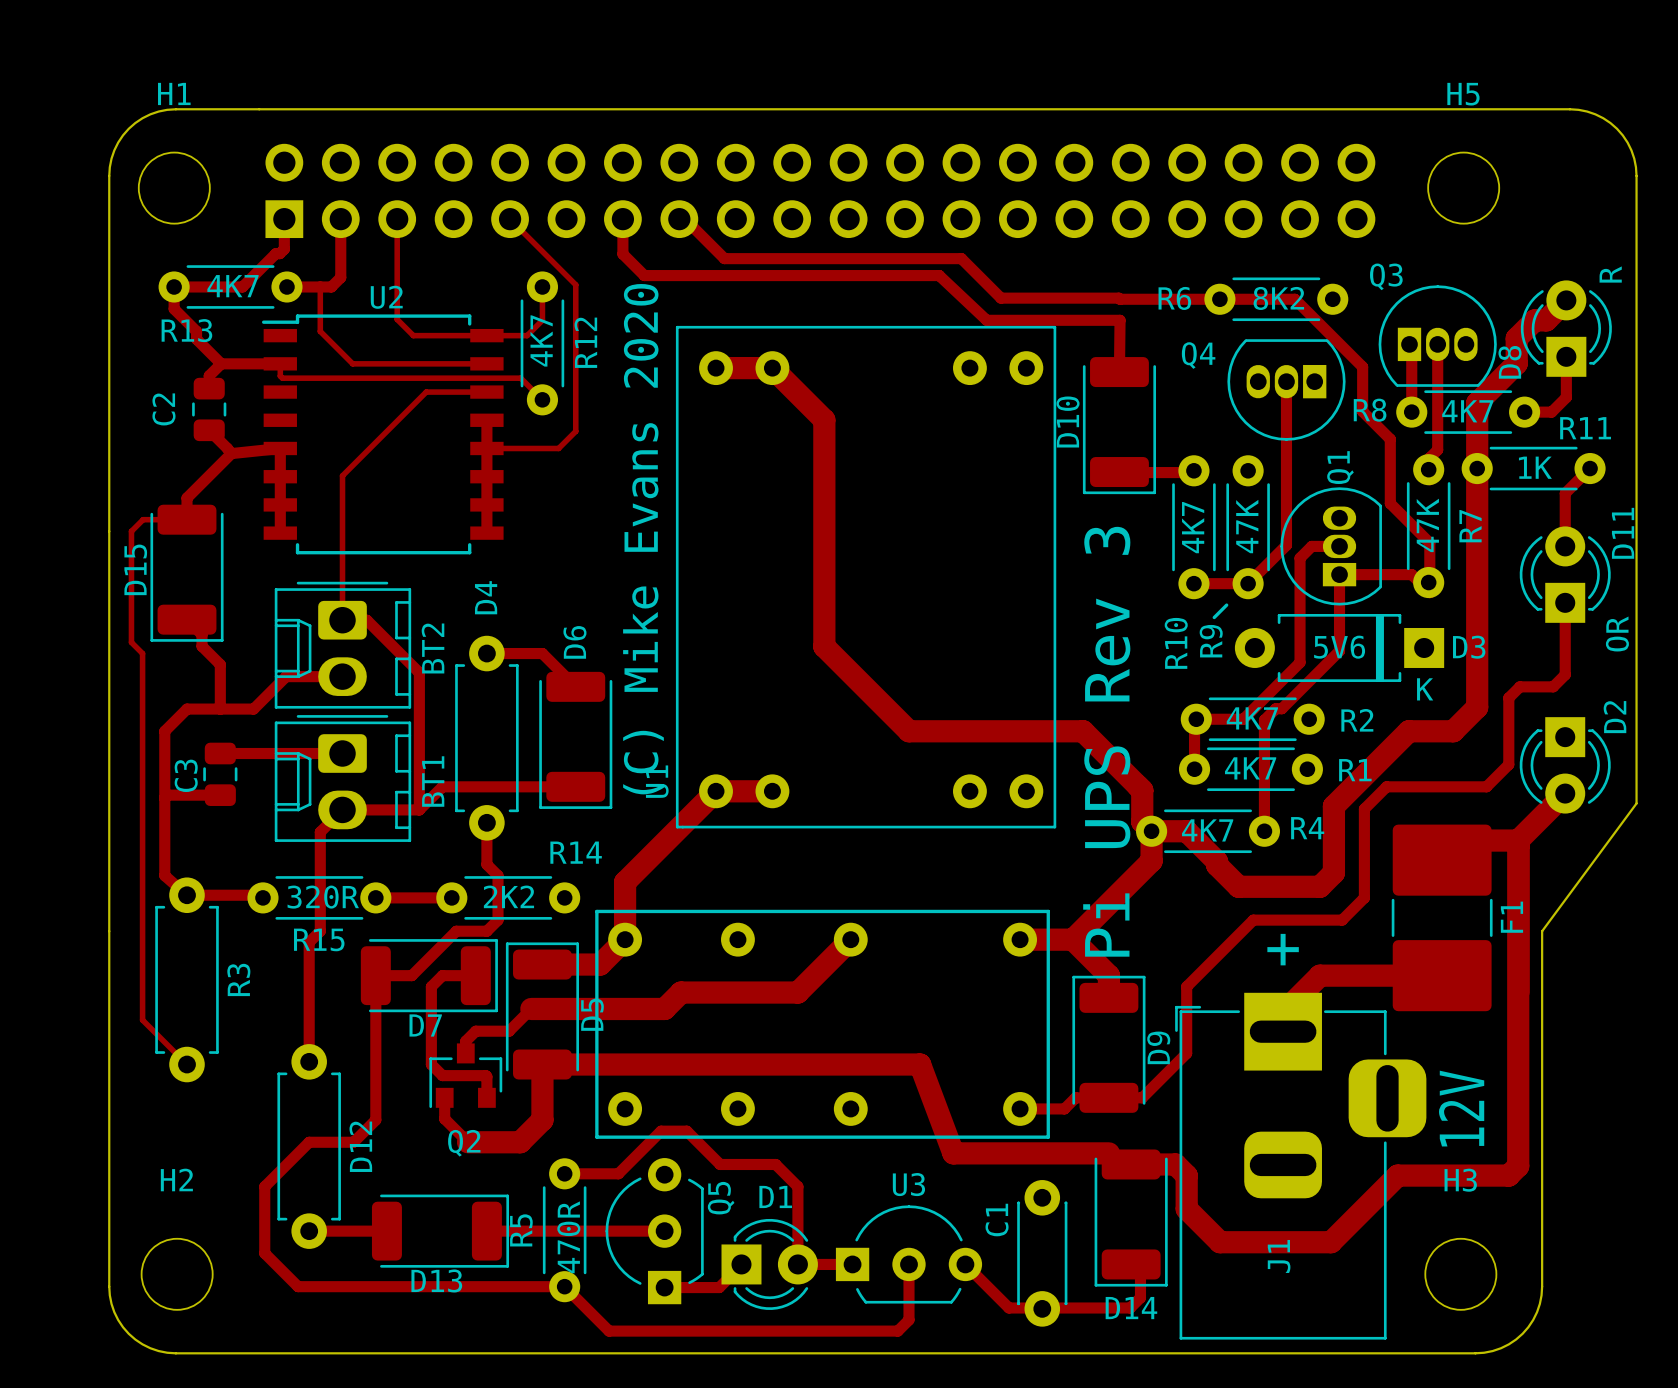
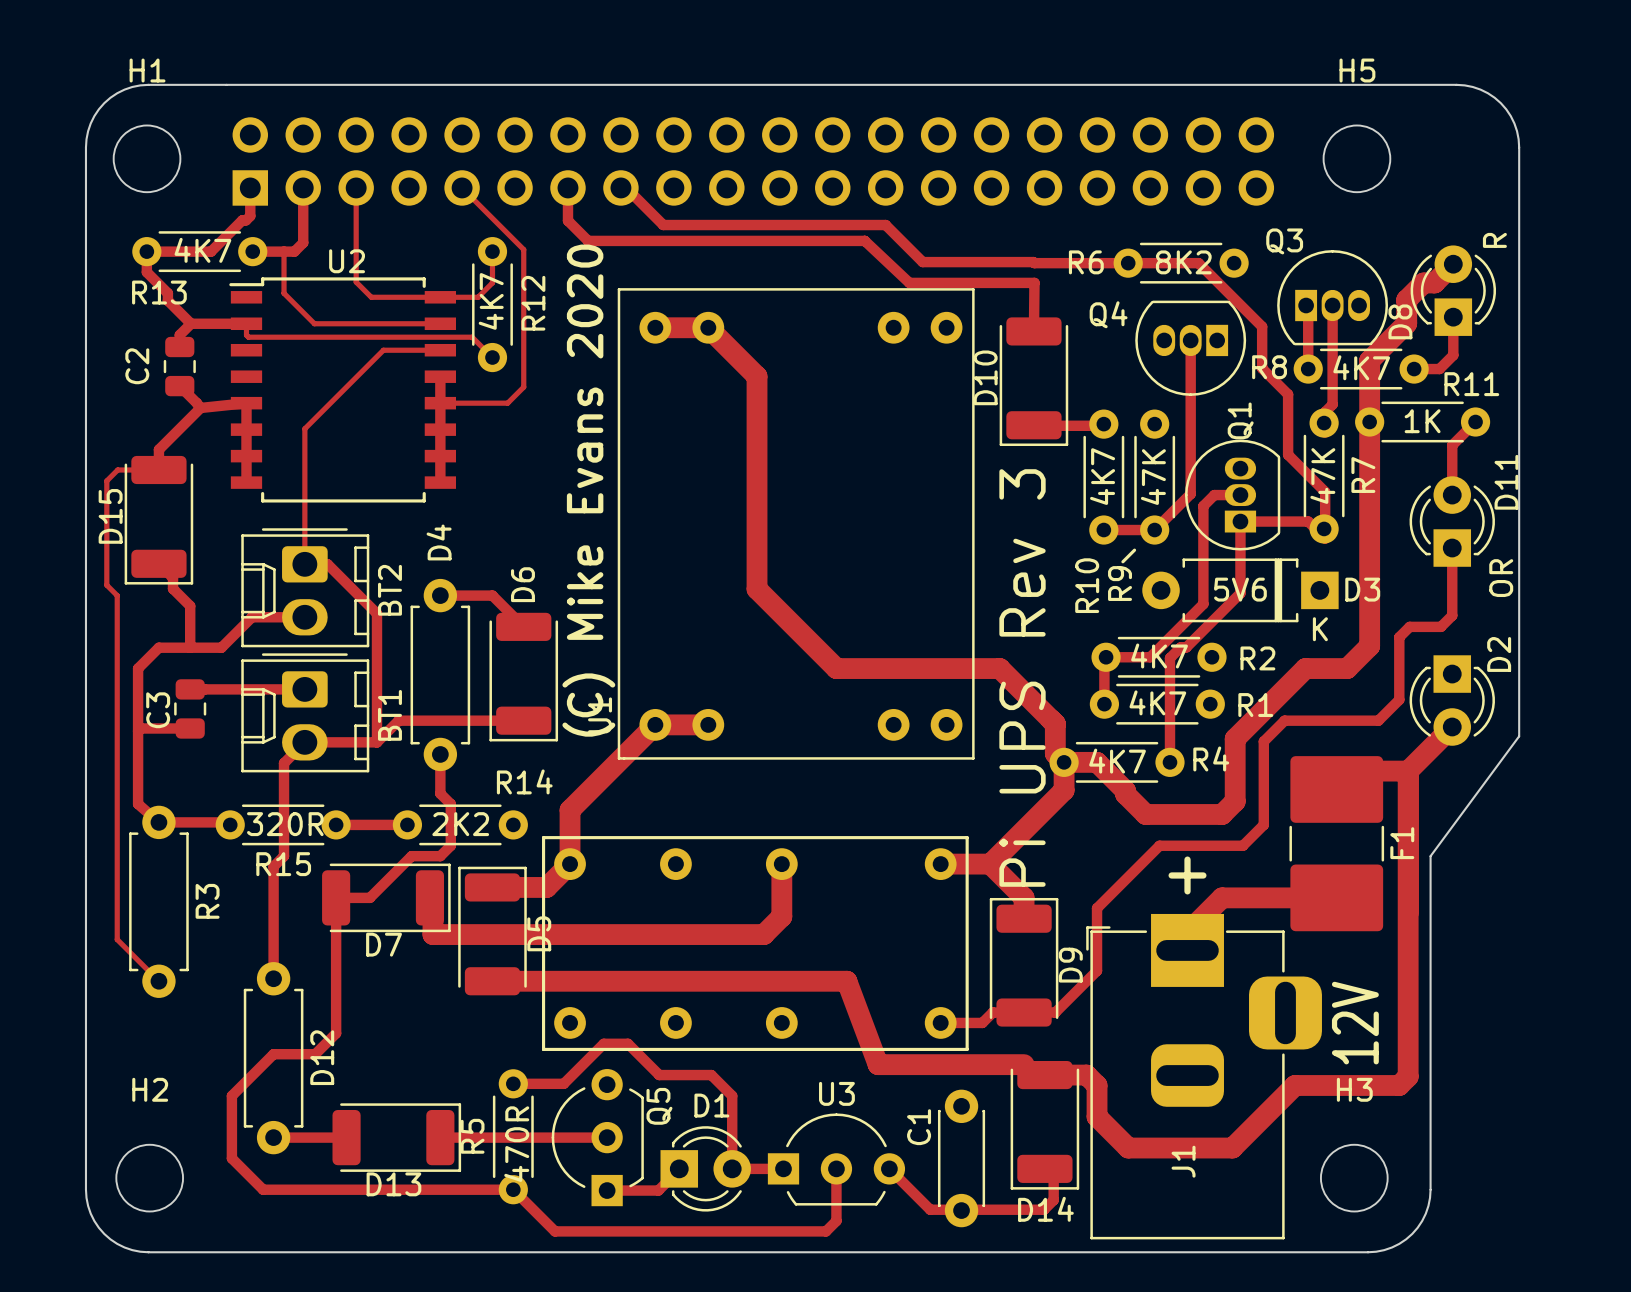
track: (850, 939) (797, 992) (681, 992) (664, 1008) (531, 1008) (509, 1031) (475, 1031) (465, 1041) (465, 1053) -> (781, 864) (781, 916) (763, 934) (432, 934) (432, 900) (429, 897)
track: (475, 975) (442, 975) (431, 986) (431, 1064) (442, 1075) (485, 1075) (486, 1097) -> none
track: (542, 1064) (542, 1120) (520, 1142) (468, 1142) (444, 1118) (444, 1097) -> none
Q2: (465, 1075) -> none

